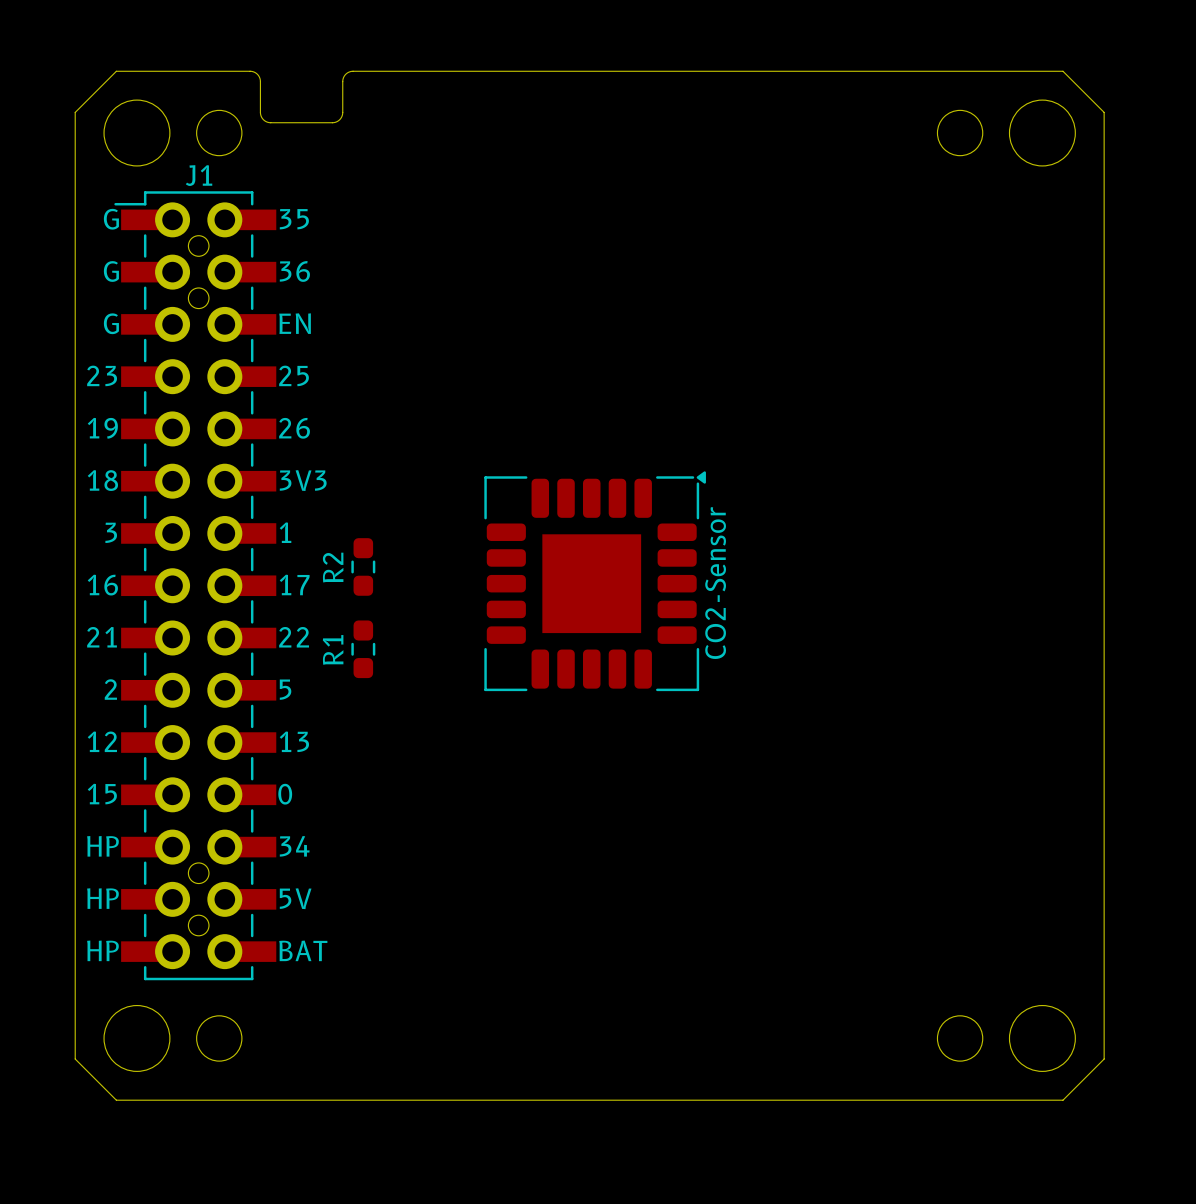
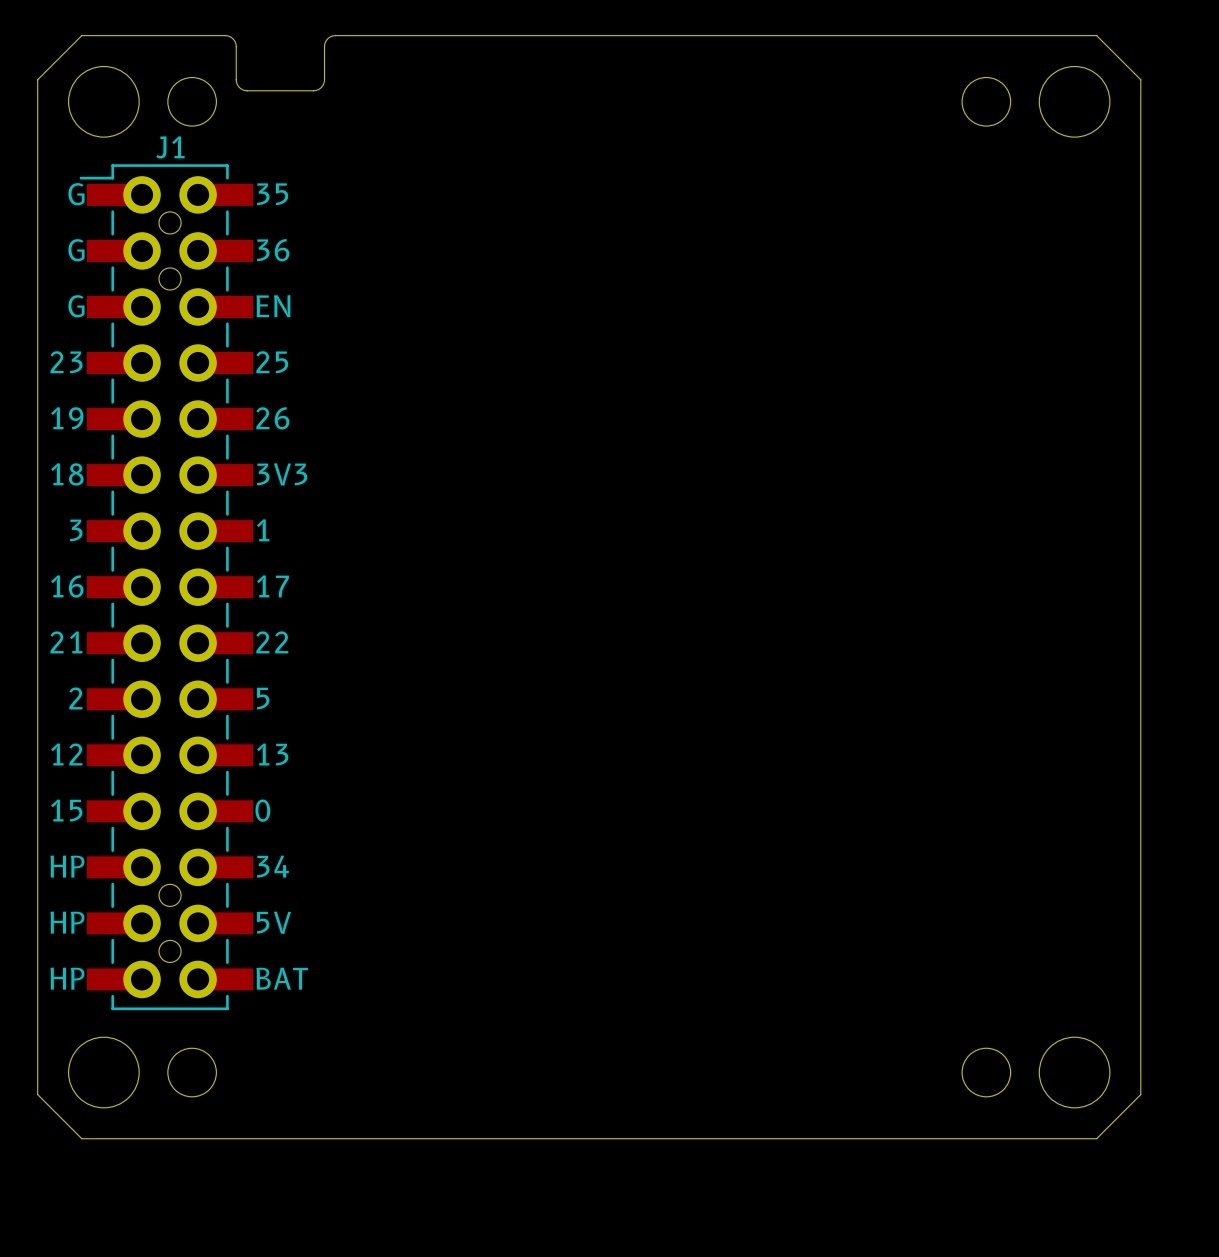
R2: (363, 566) -> none
CO2-Sensor: (595, 581) -> none
R1: (363, 649) -> none

